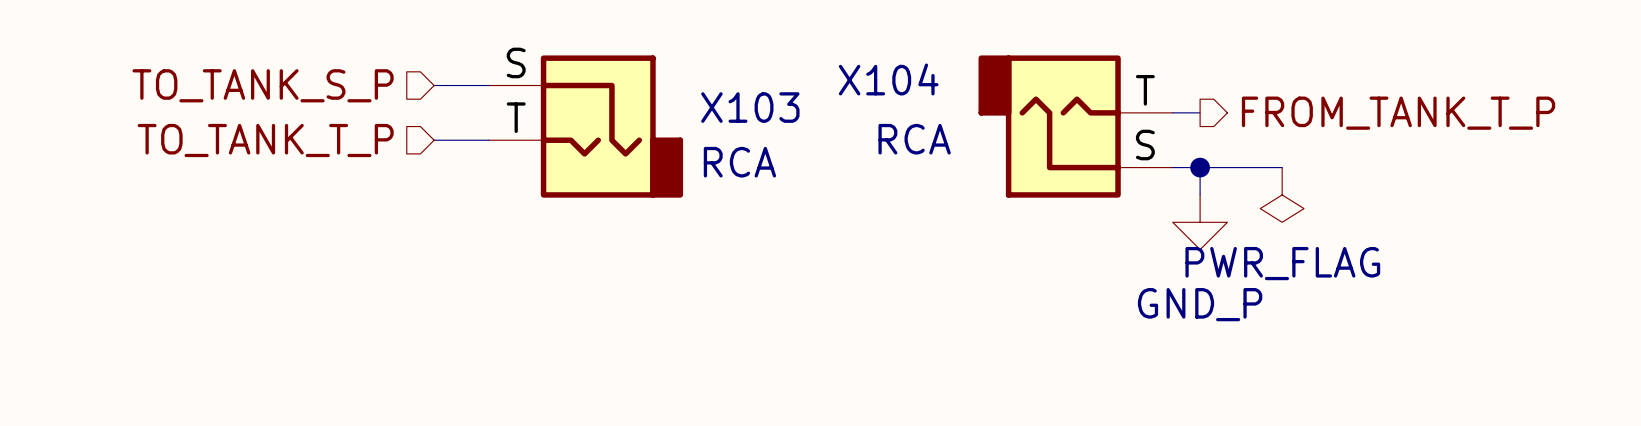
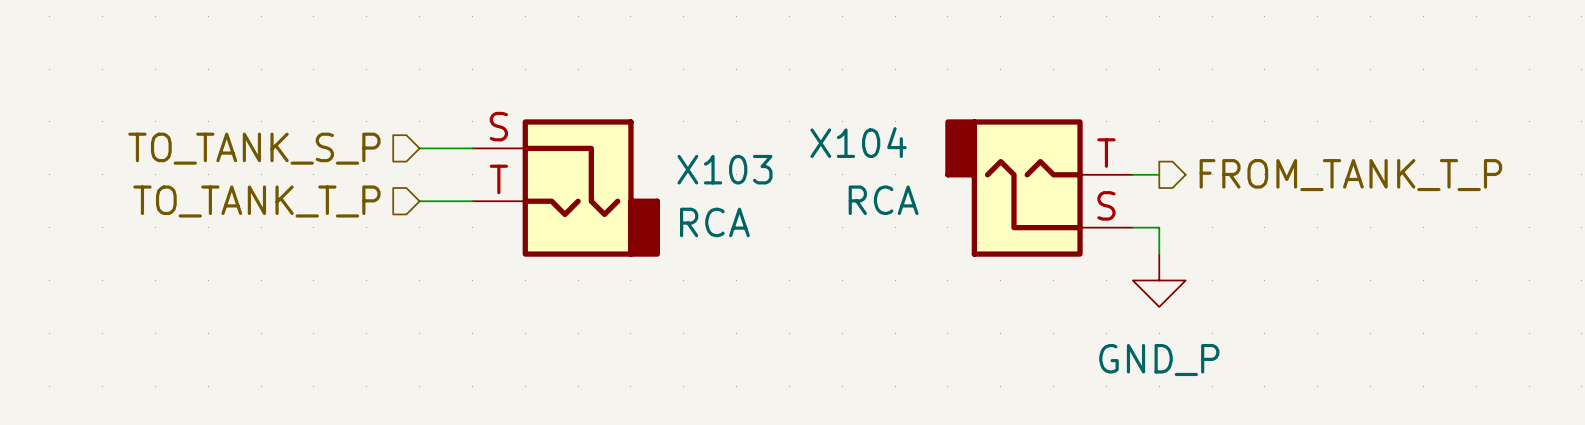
wire: (1200, 167) (1282, 167) -> none
junction: (1200, 167) -> none
power symbol: PWR_FLAG (1282, 194) -> none

